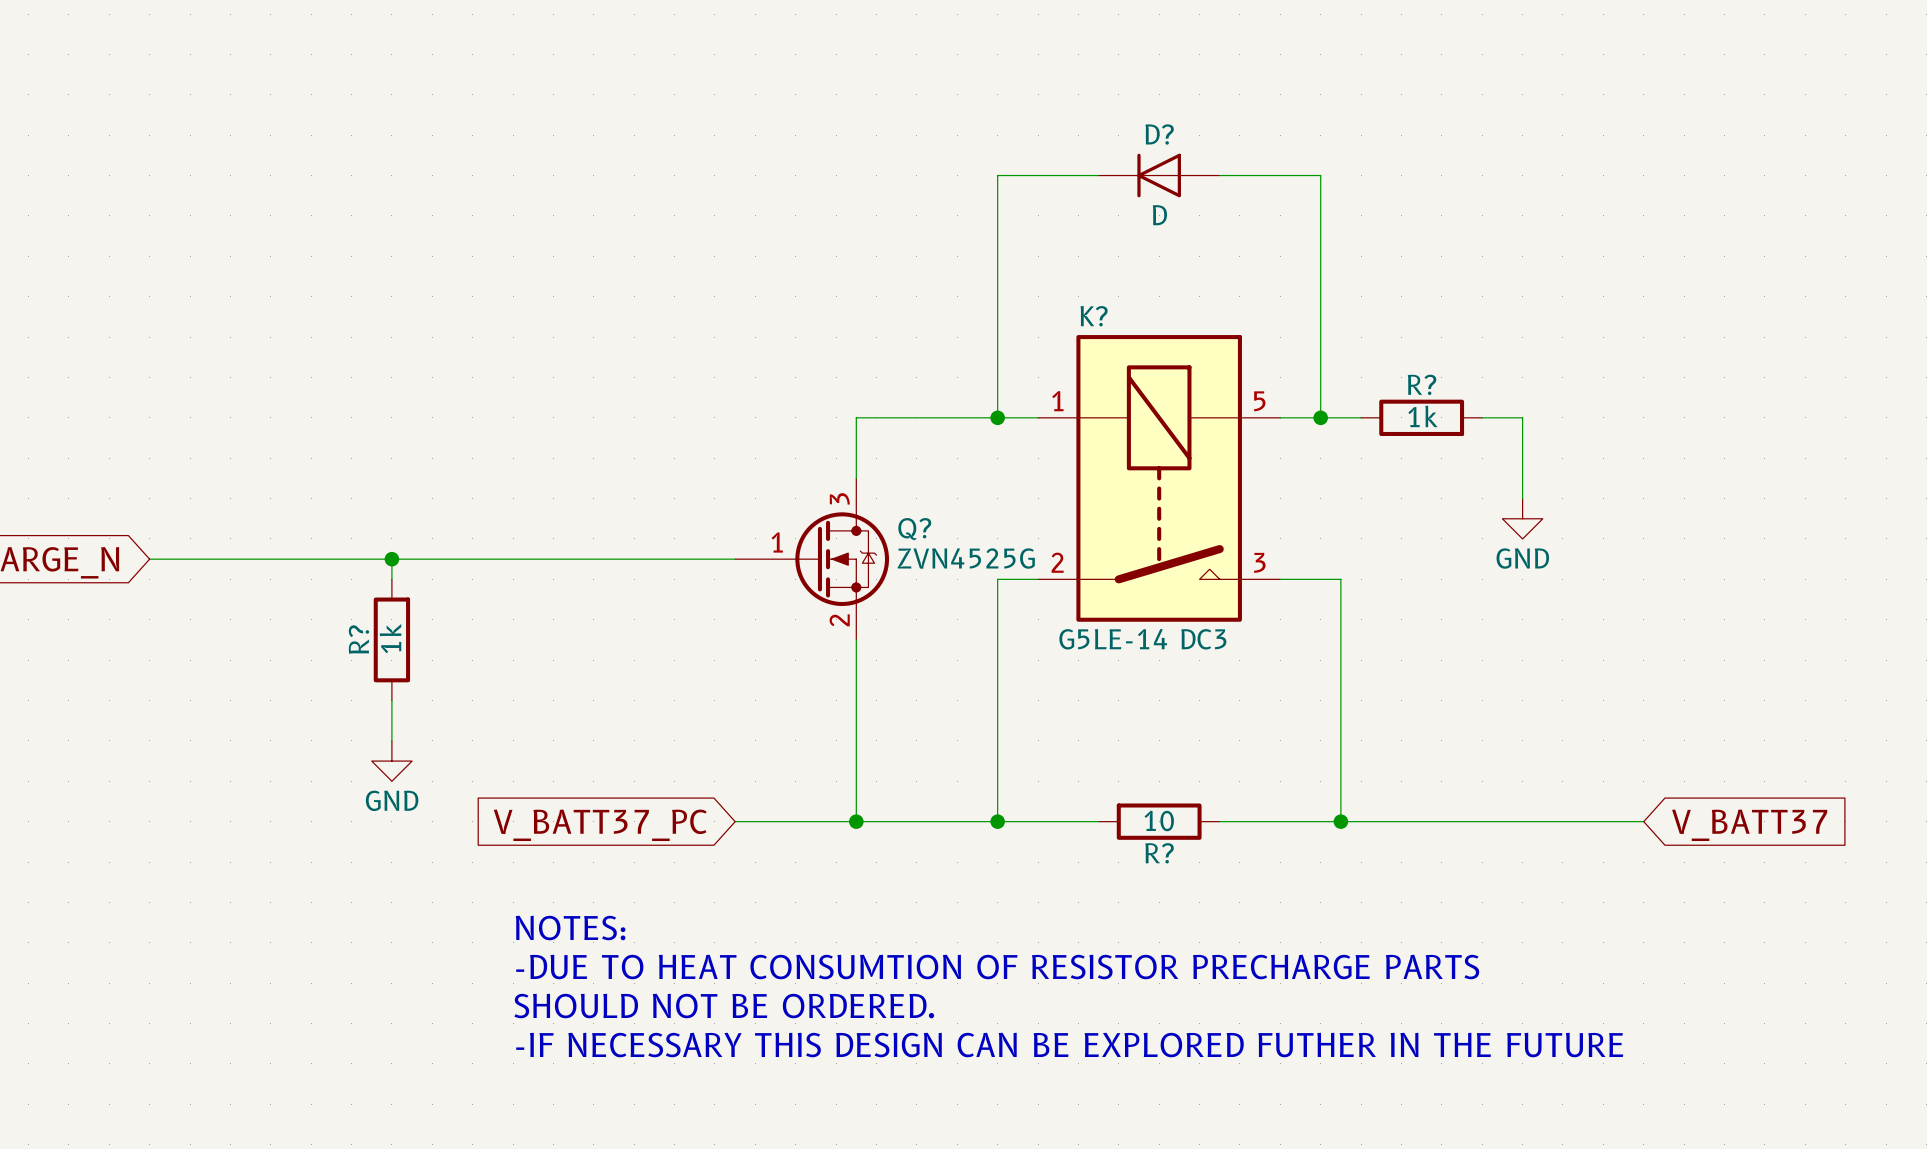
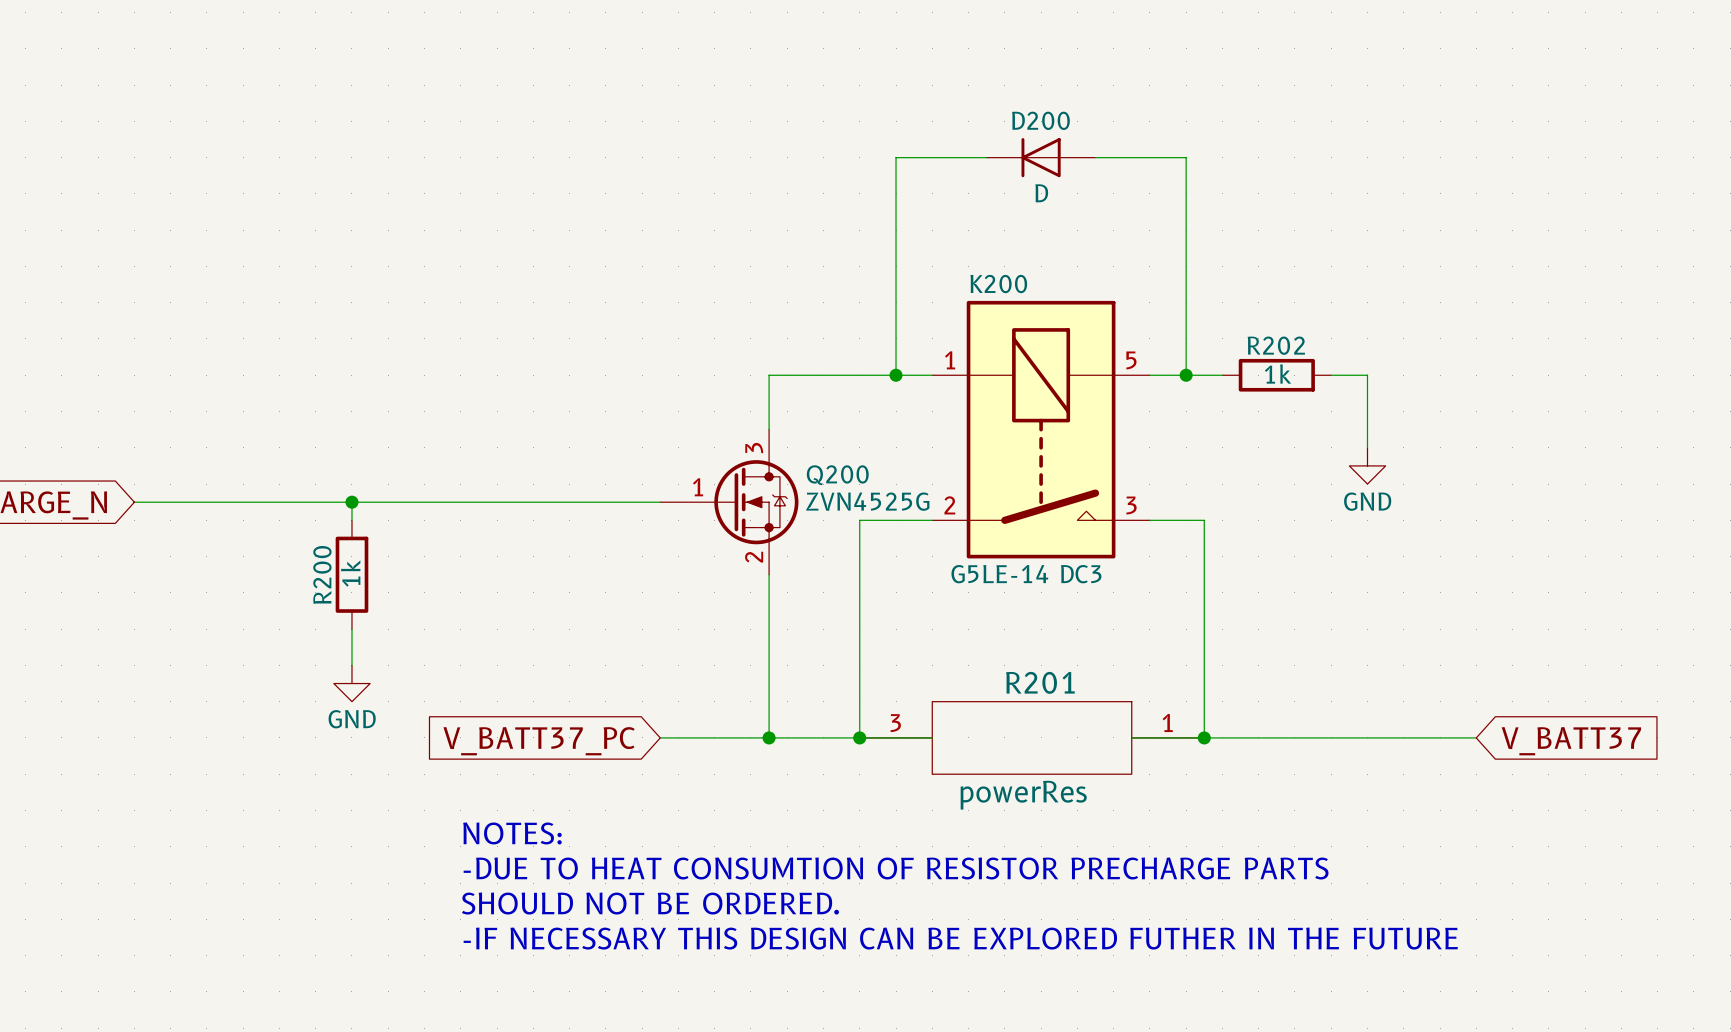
D? name: D? (1159, 134) -> D200 (1040, 120)
K? name: K? (1094, 316) -> K200 (998, 284)
R? name: R? (1422, 384) -> R202 (1276, 345)
Q? name: Q? (914, 529) -> Q200 (837, 475)
wire: (997, 579) (997, 821) -> (896, 520) (859, 520) (859, 737)
R? name: R? (358, 639) -> R200 (322, 574)
junction position: (997, 821) -> (859, 737)
wire: (1038, 821) (1098, 821) -> none
R201: none -> powerRes (1032, 737)
R?: 10 (1159, 821) -> none
wire: (1219, 821) (1260, 821) -> none

